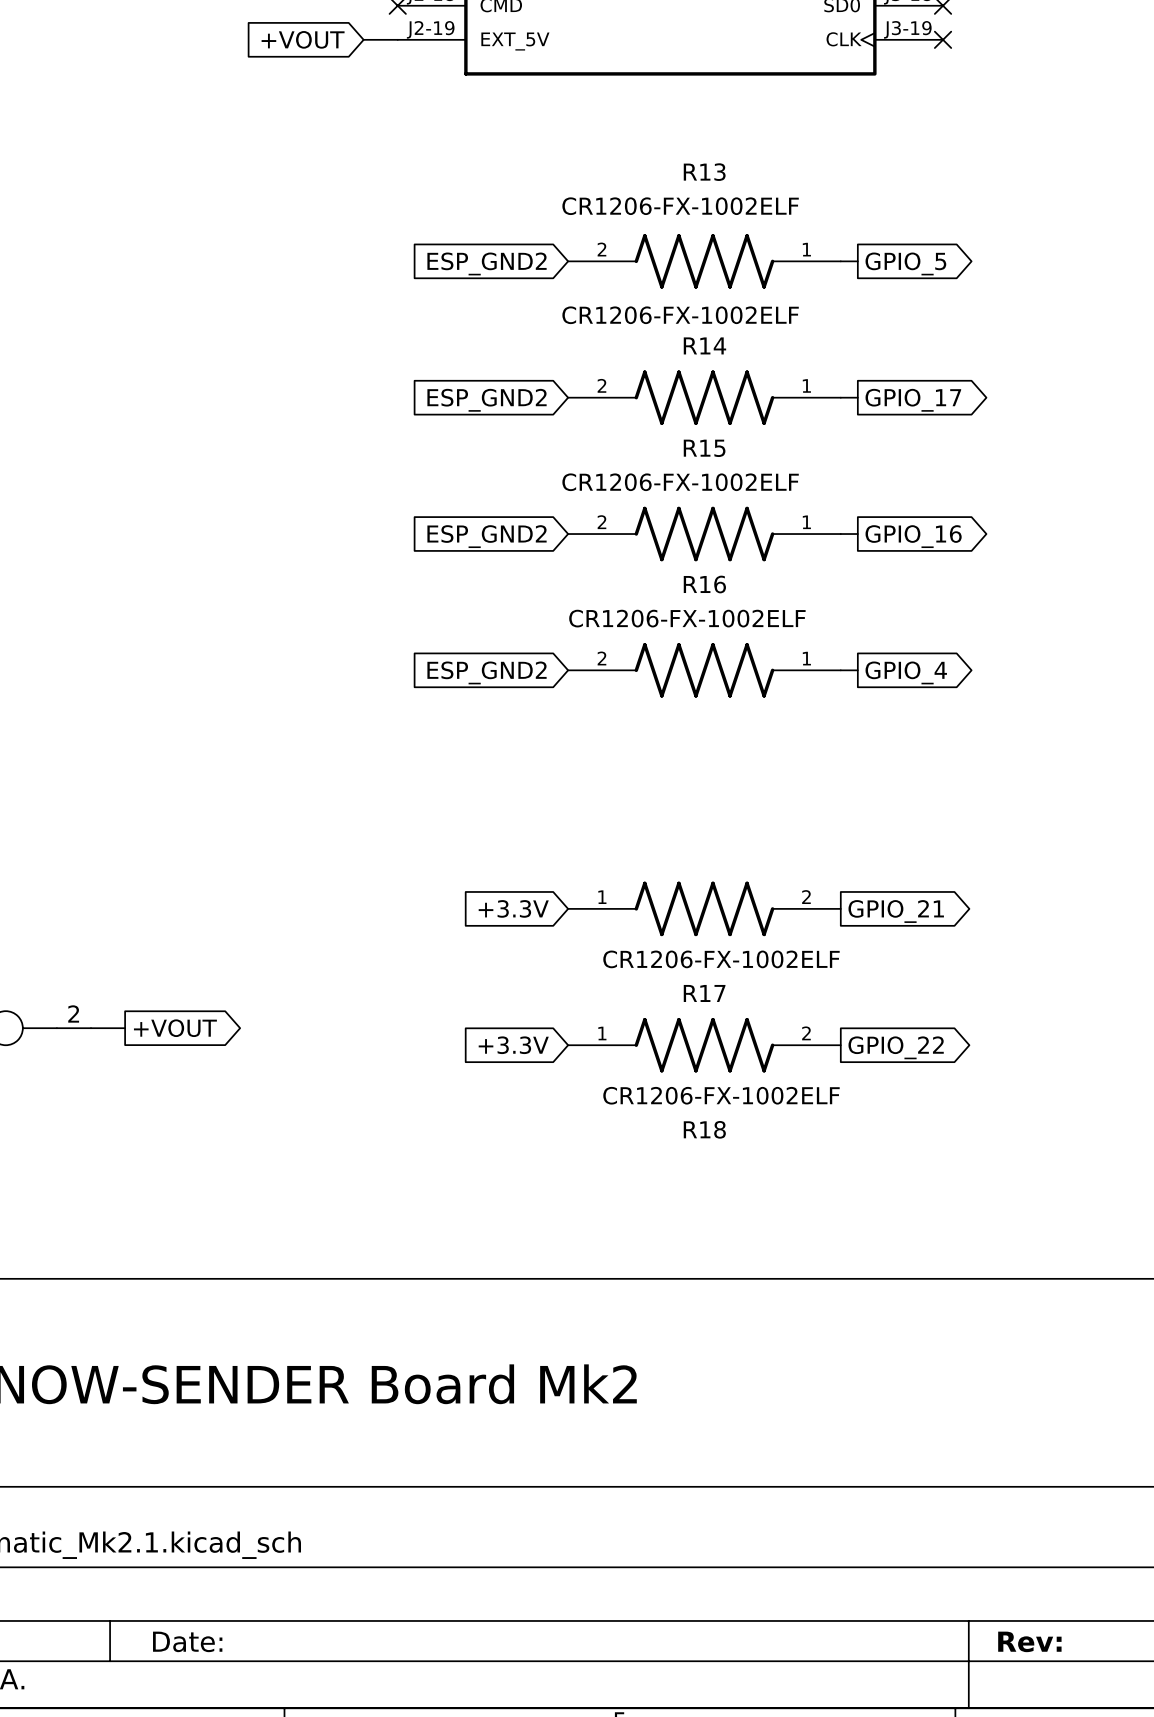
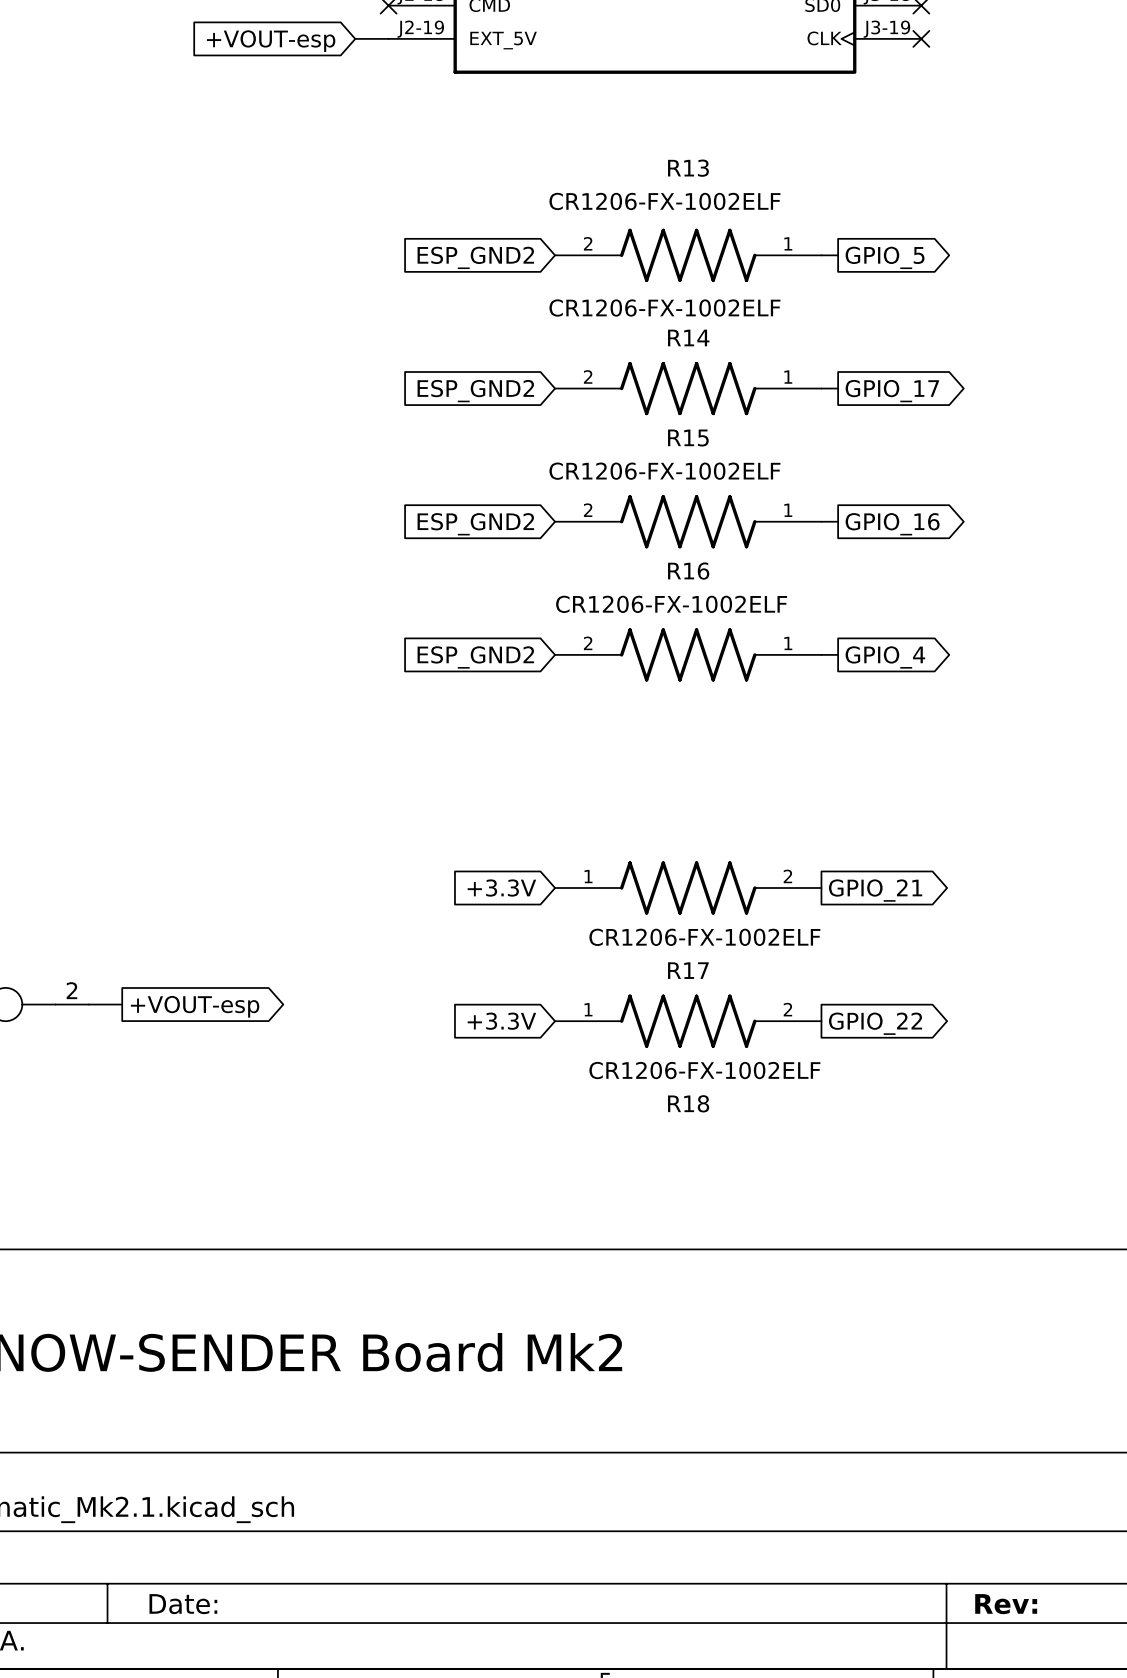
global label: +VOUT (303, 39) -> +VOUT-esp (271, 41)
global label: +VOUT (175, 1028) -> +VOUT-esp (195, 1006)

